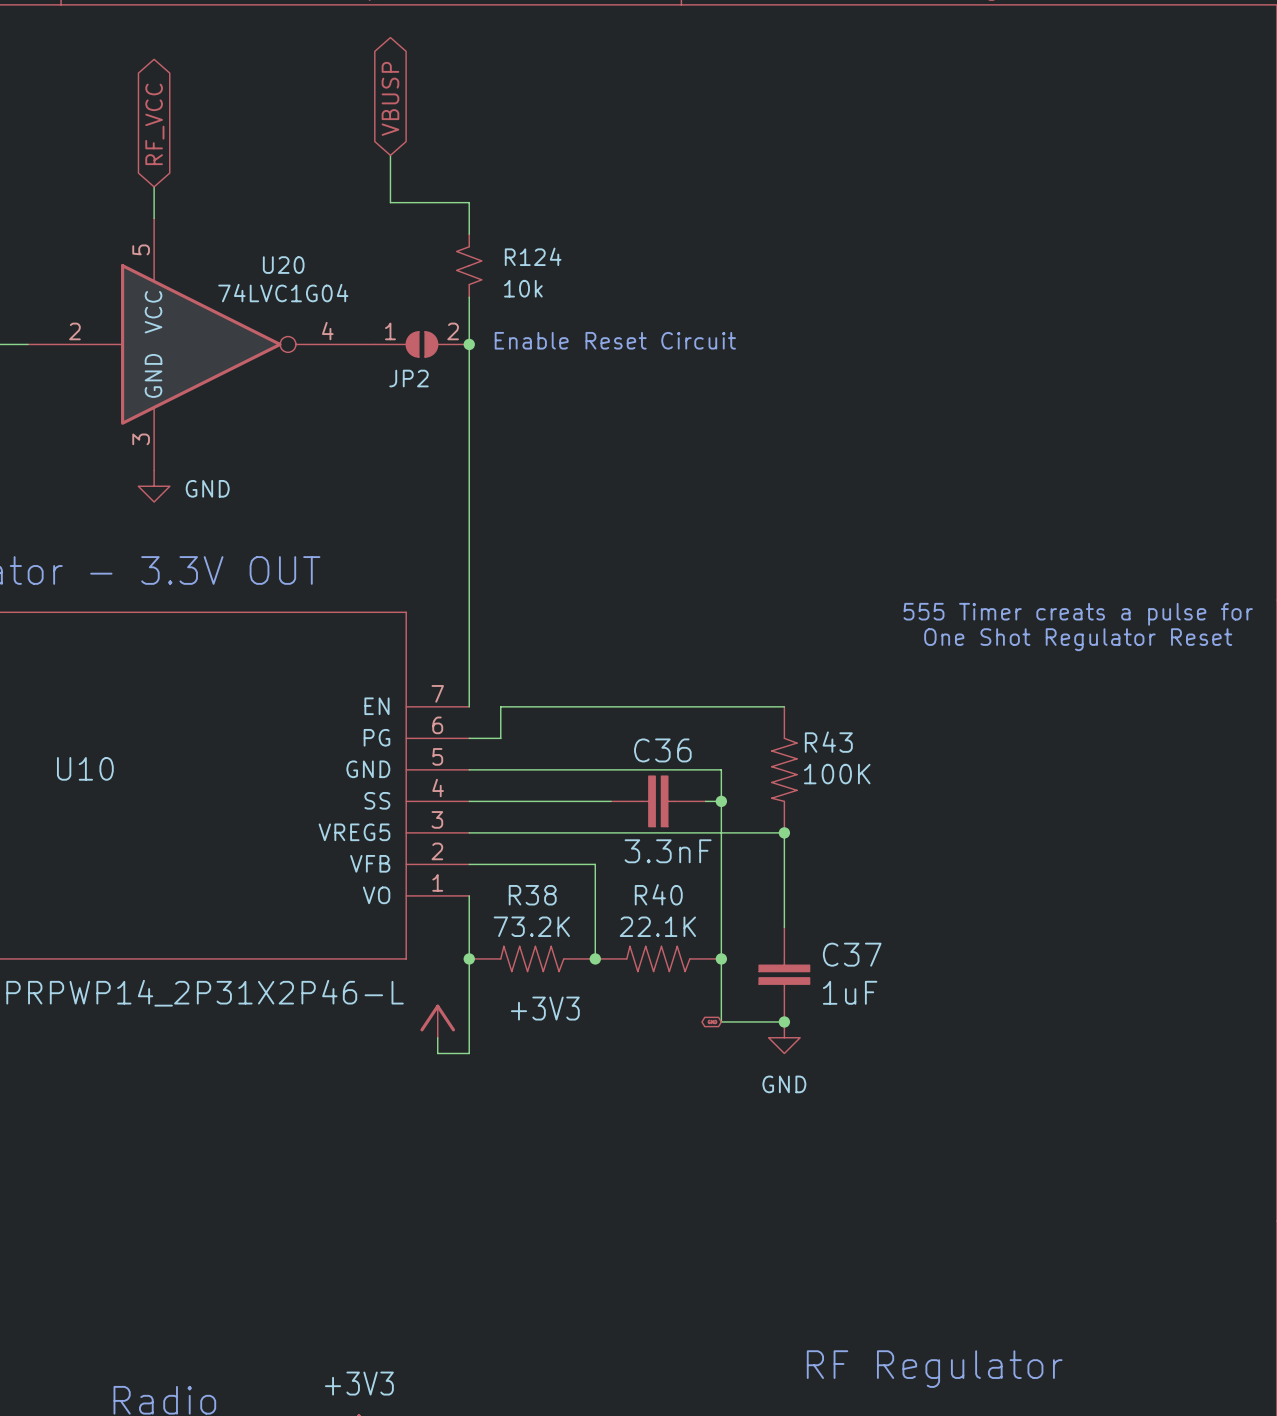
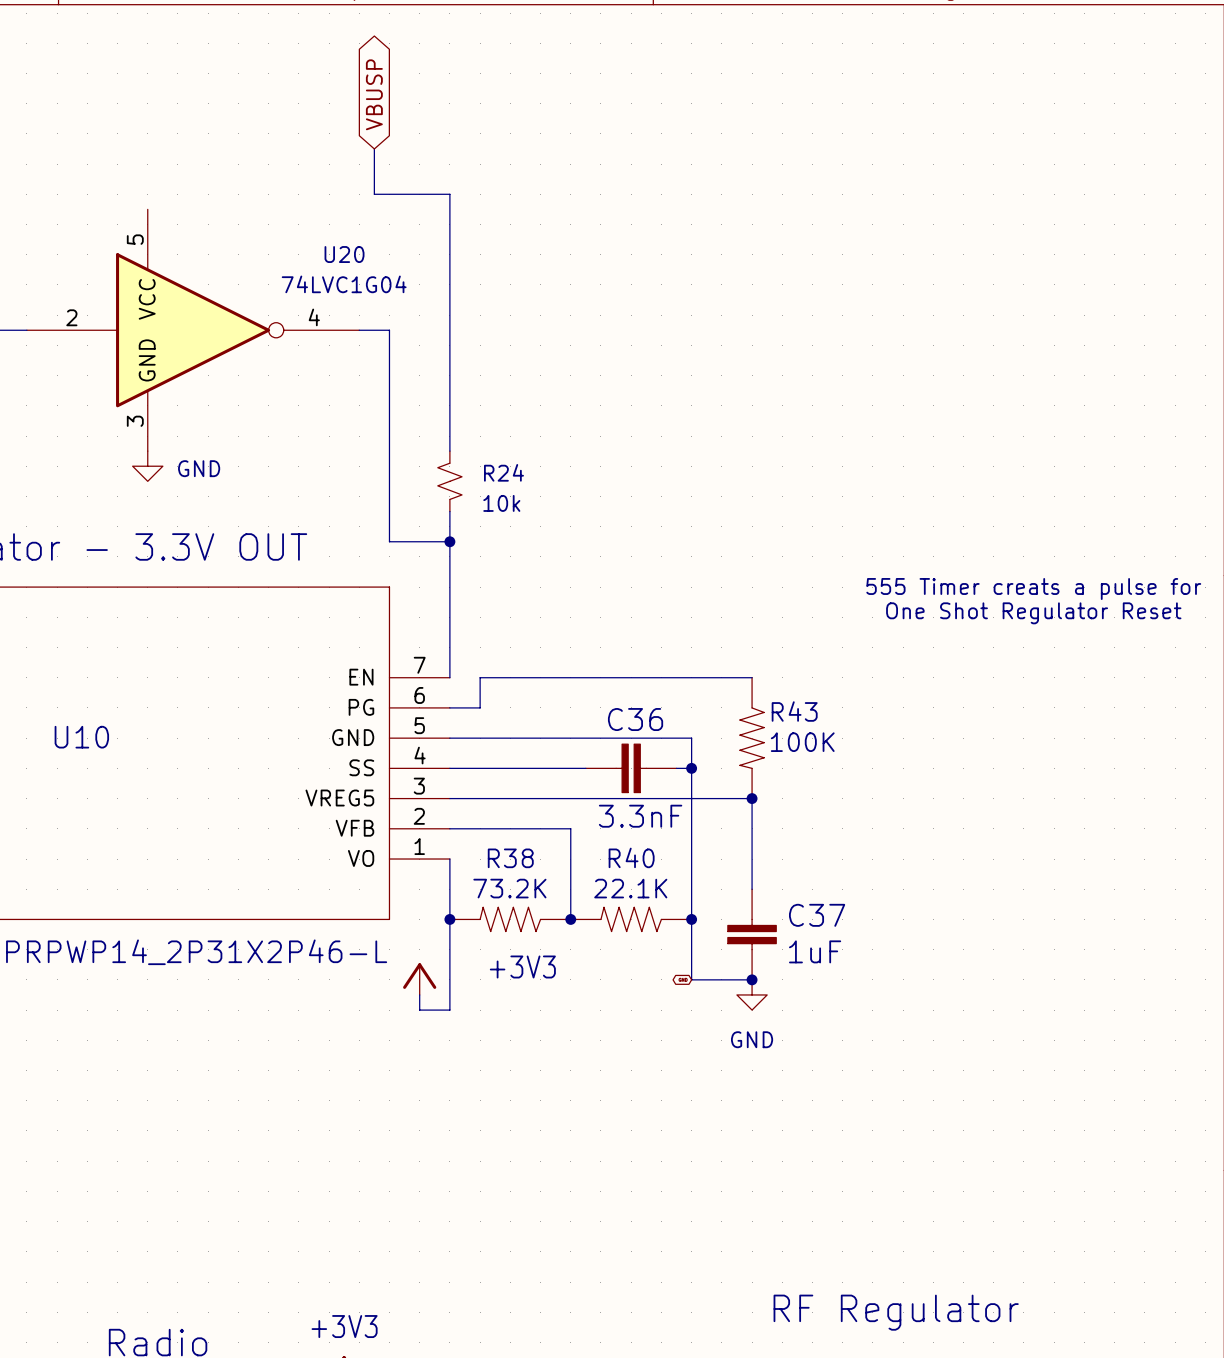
global label: RF_VCC (154, 124) -> none
wire: (154, 186) (154, 218) -> none
U20 name position: U20 (283, 265) -> U20 (344, 254)
R124: 10k (469, 265) -> none
U20 value position: 74LVC1G04 (283, 293) -> 74LVC1G04 (344, 284)
text: Enable Reset Circuit (615, 340) -> none
wire: none -> (359, 330) (389, 330) (389, 541) (449, 541)
JP2: (421, 344) -> none
junction: (469, 344) -> none
R24: none -> 10k (449, 481)
junction: none -> (449, 541)

